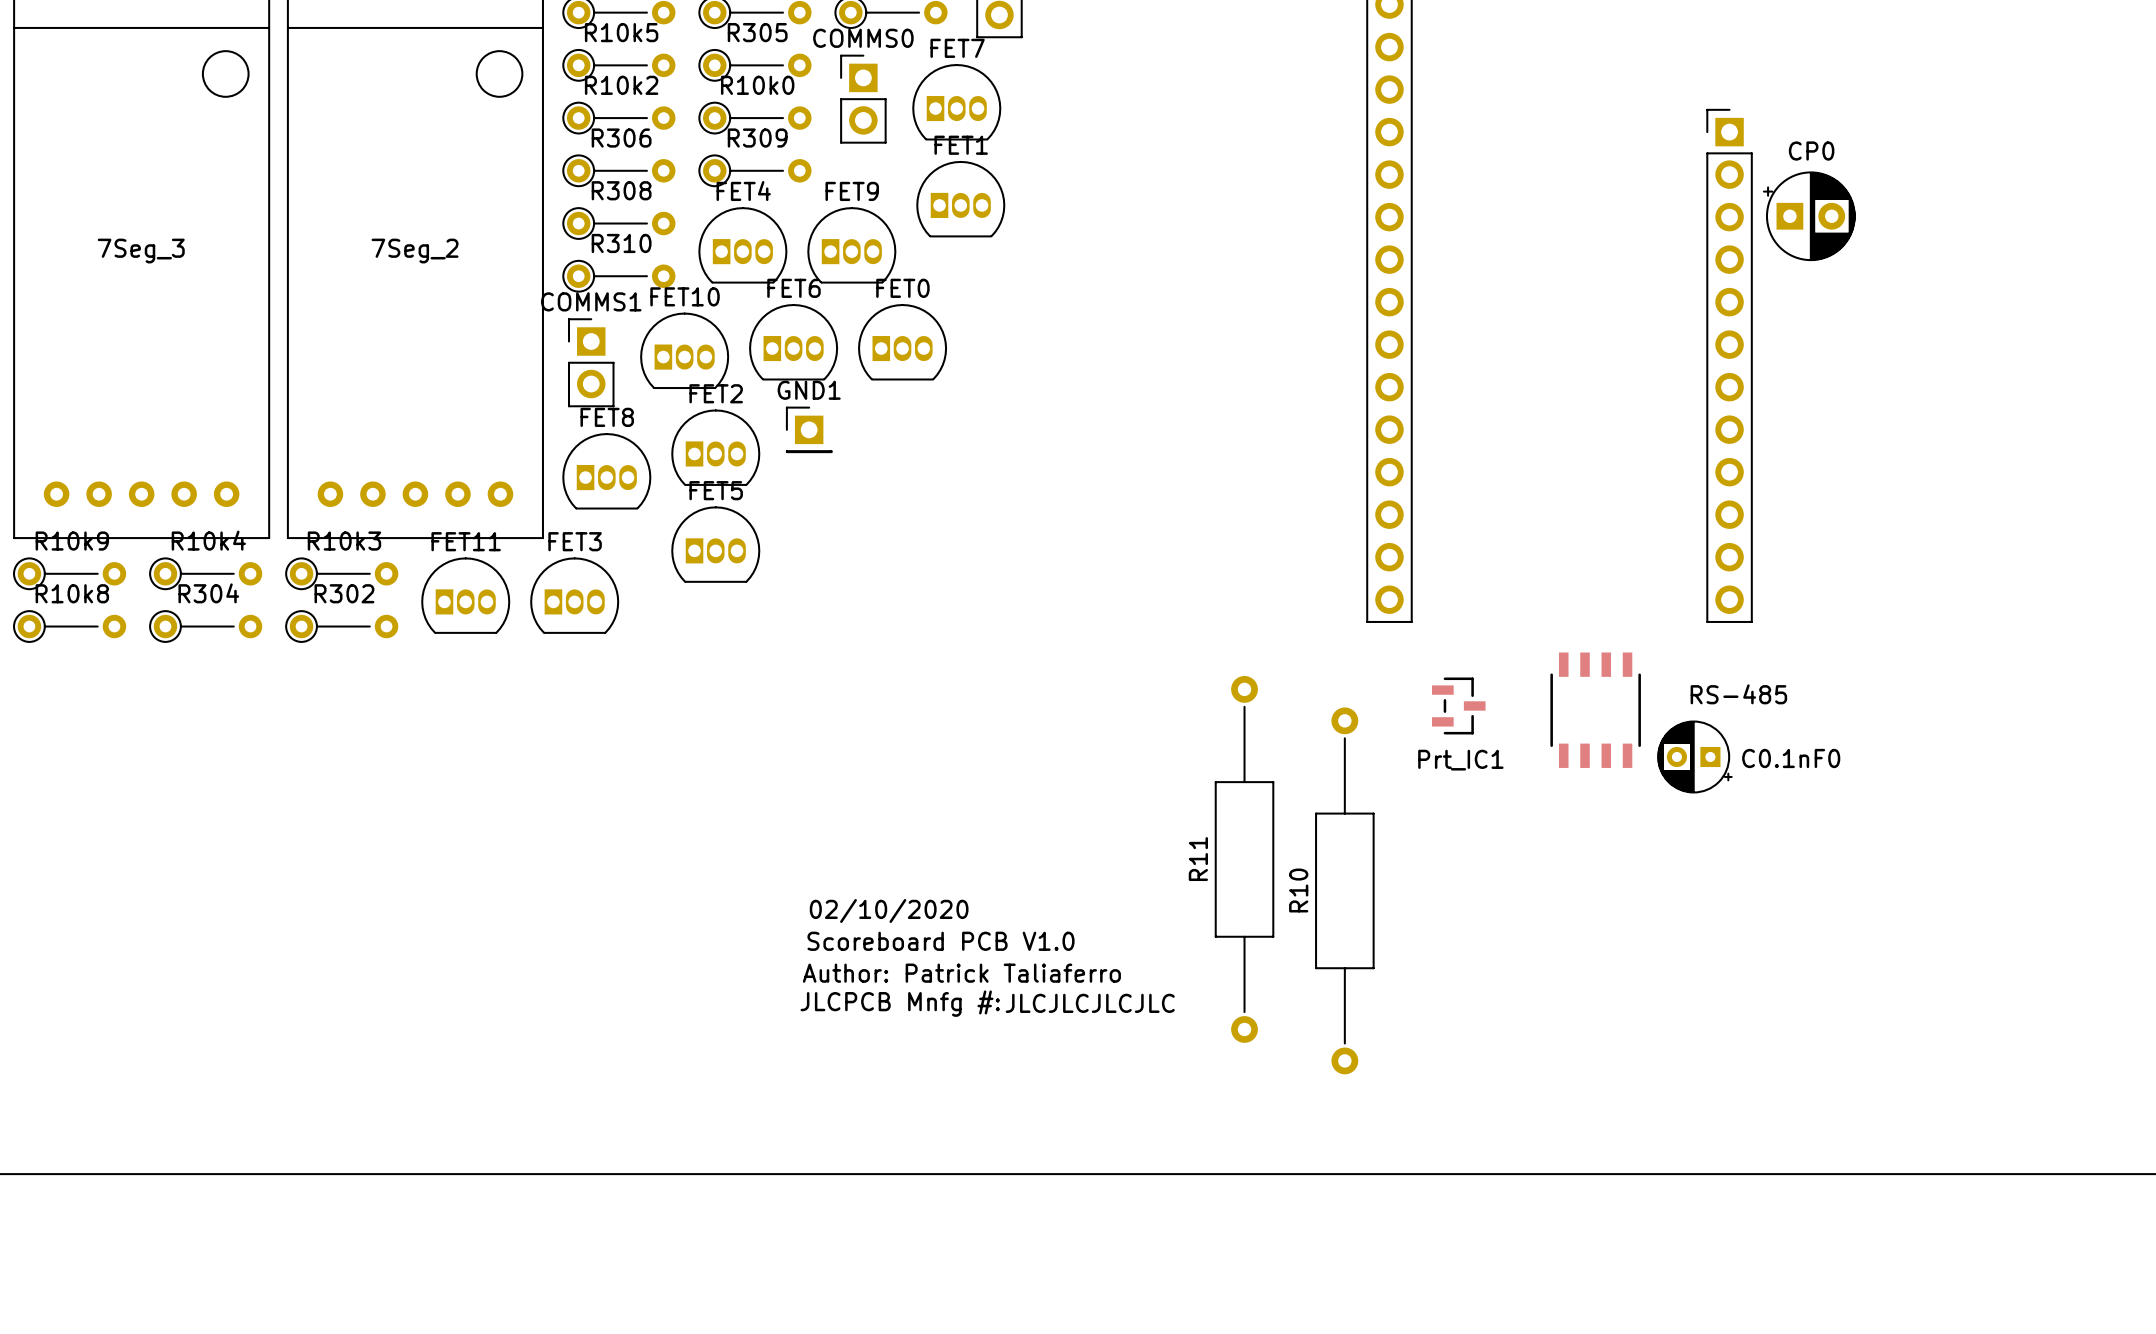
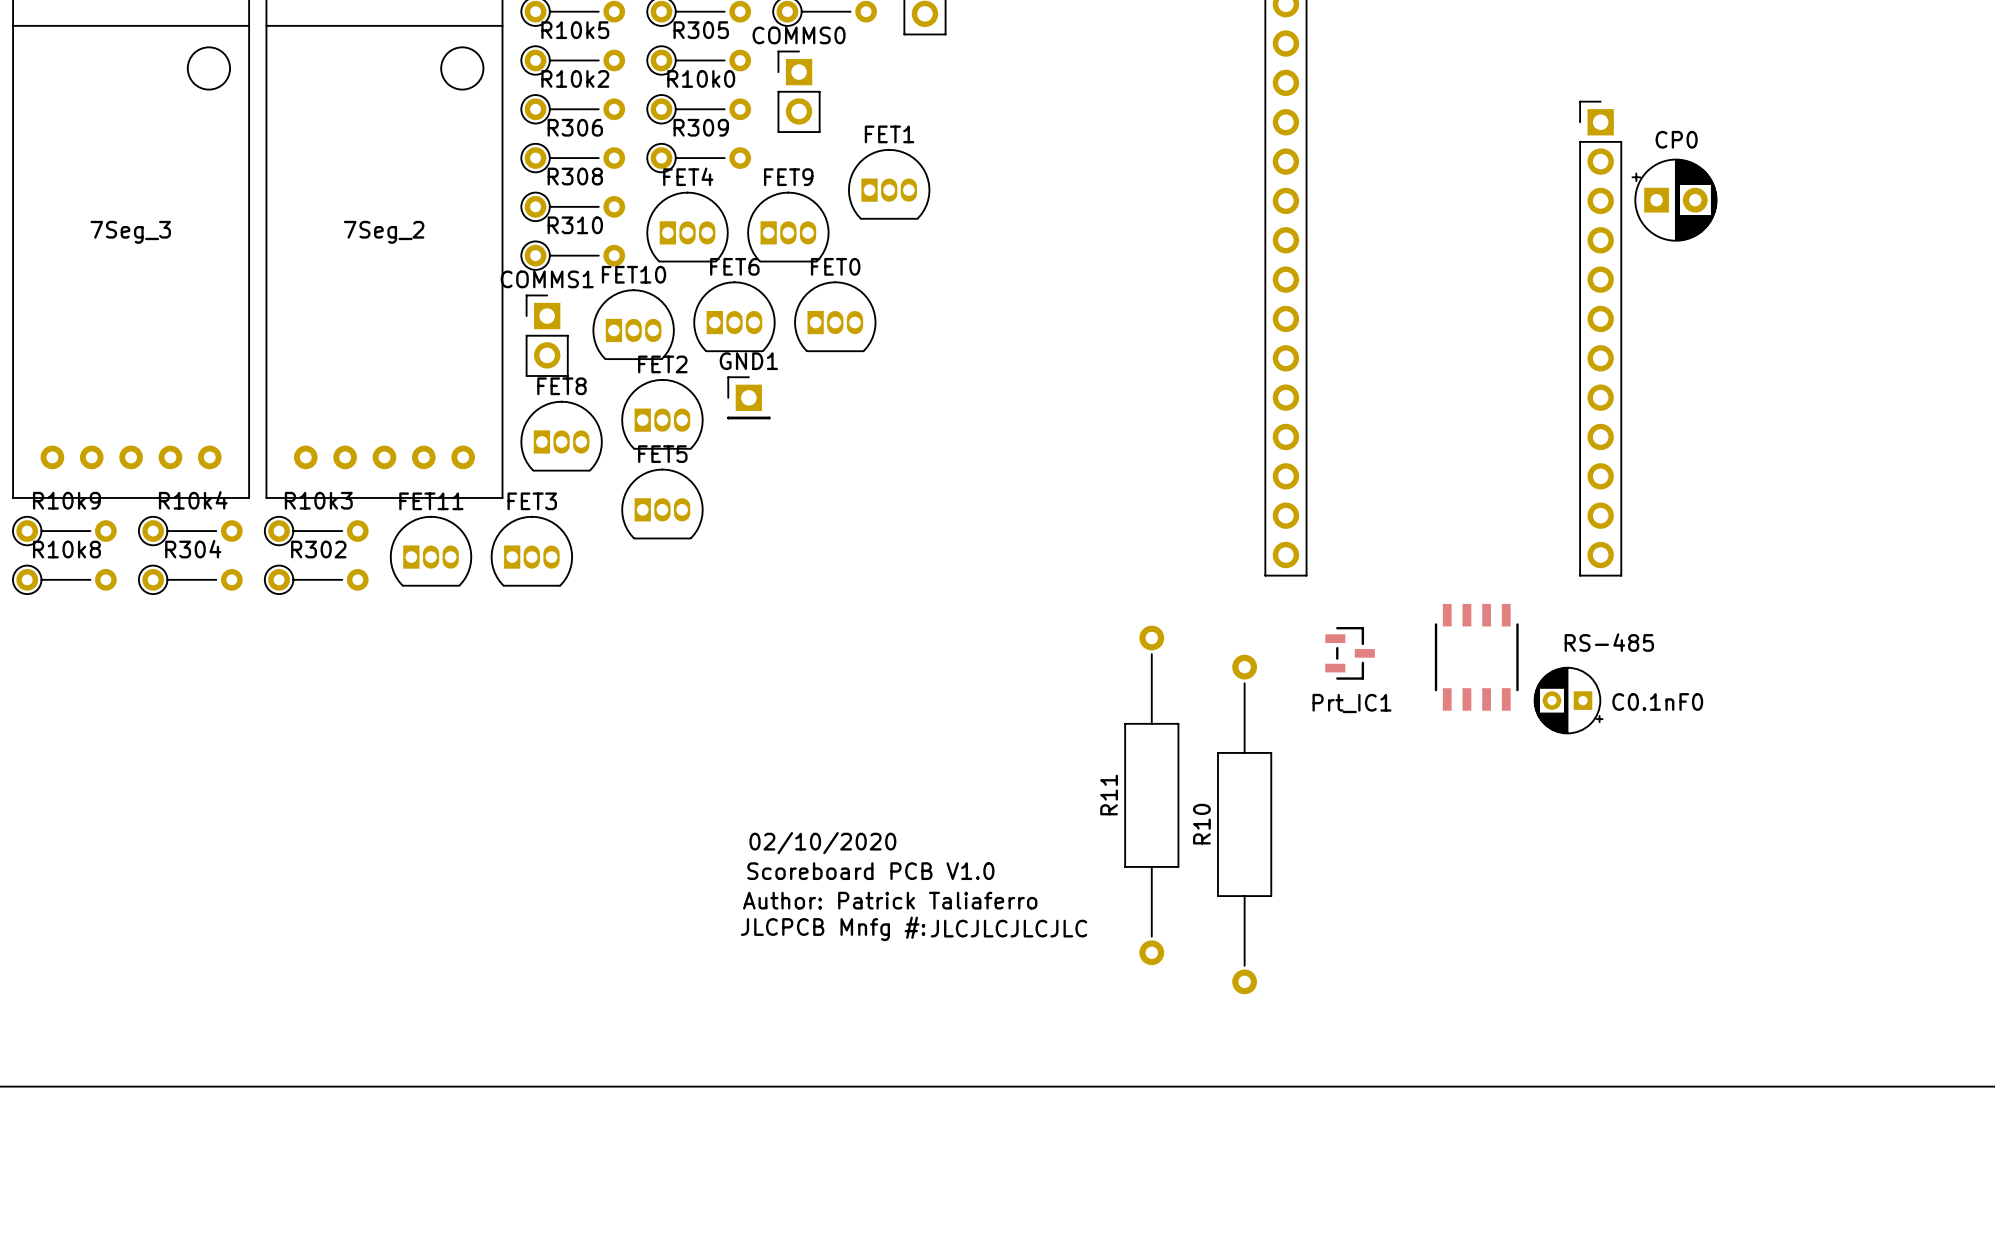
FET7: (956, 102) -> none

